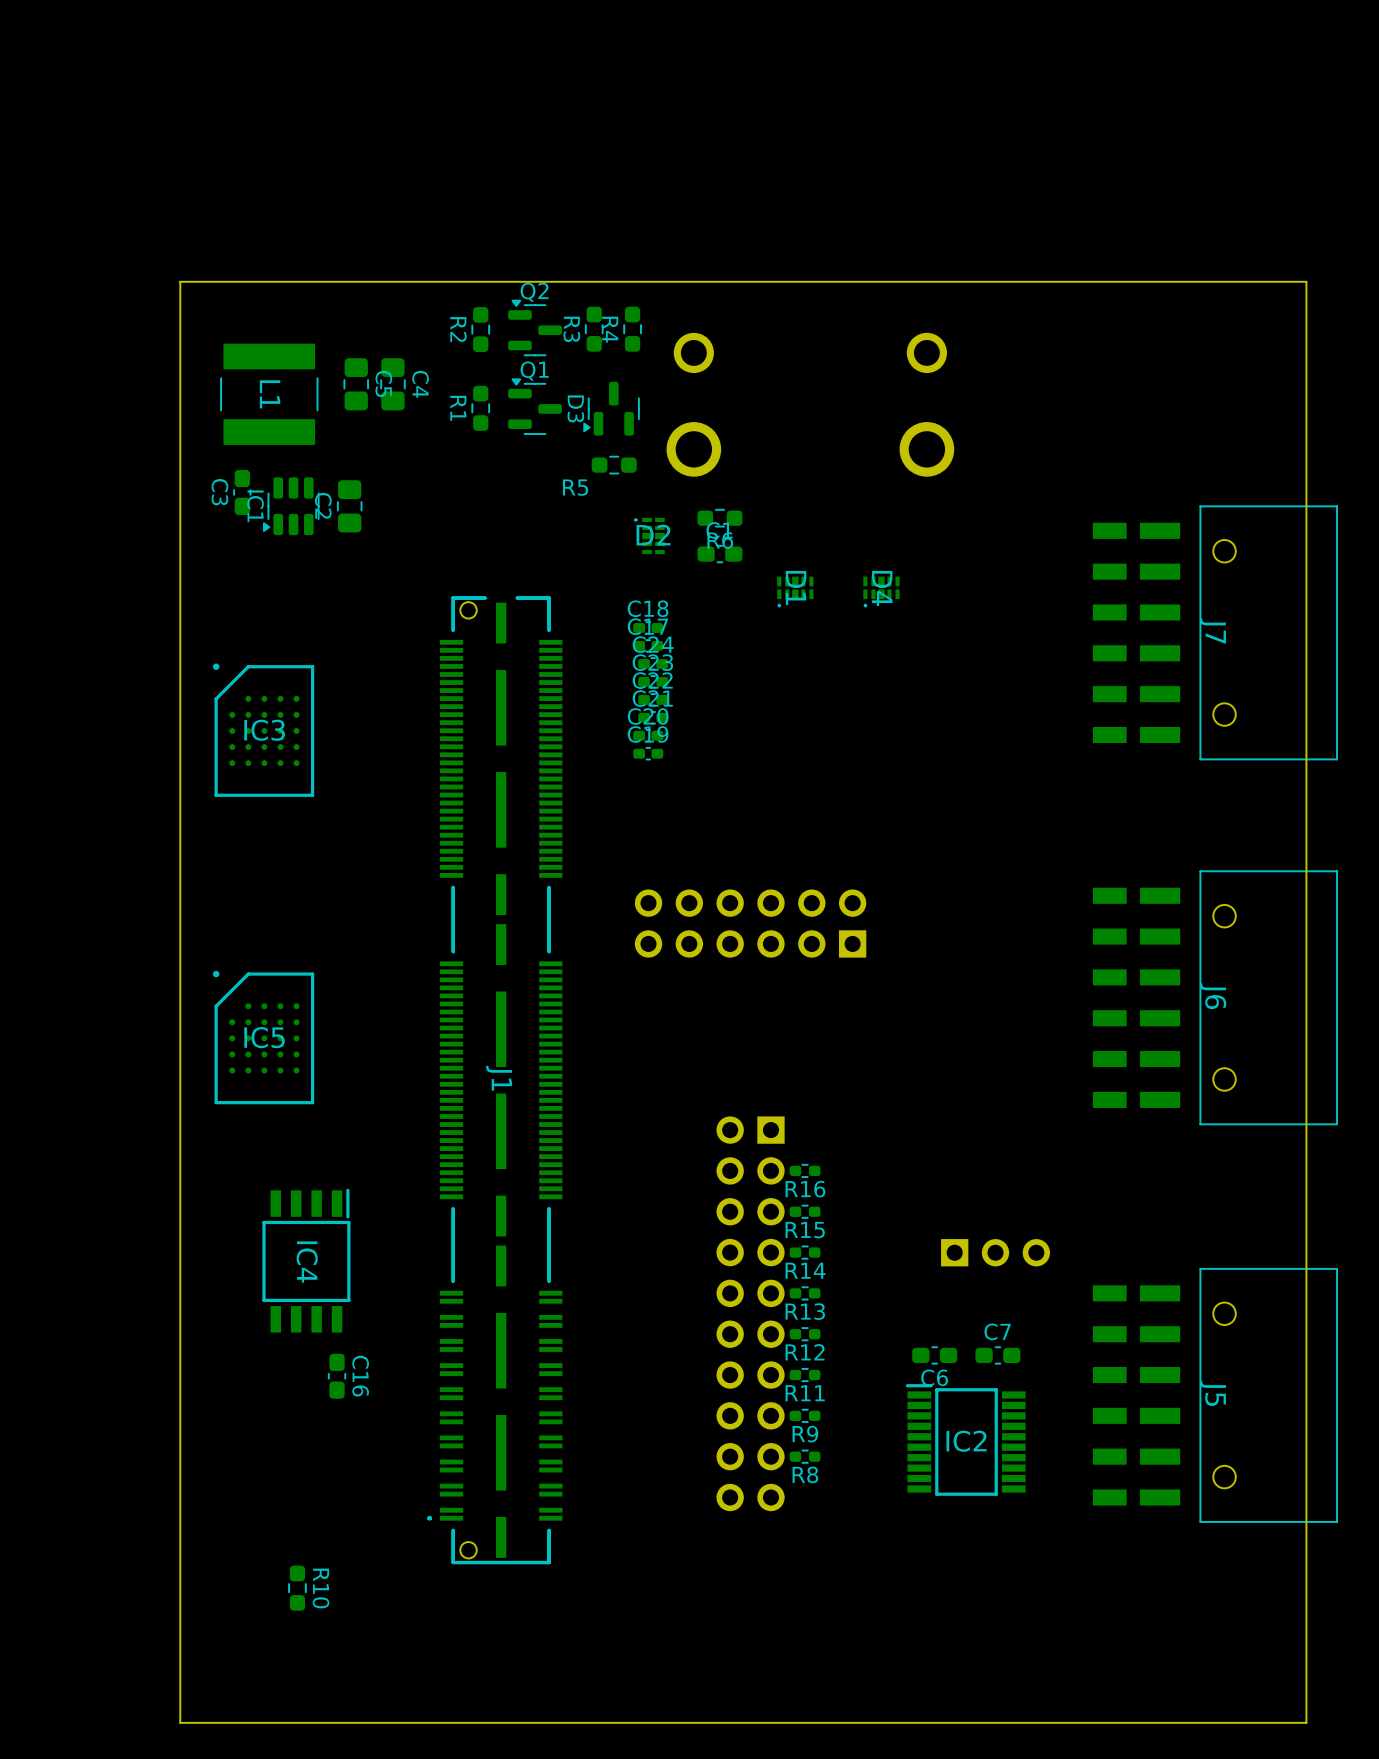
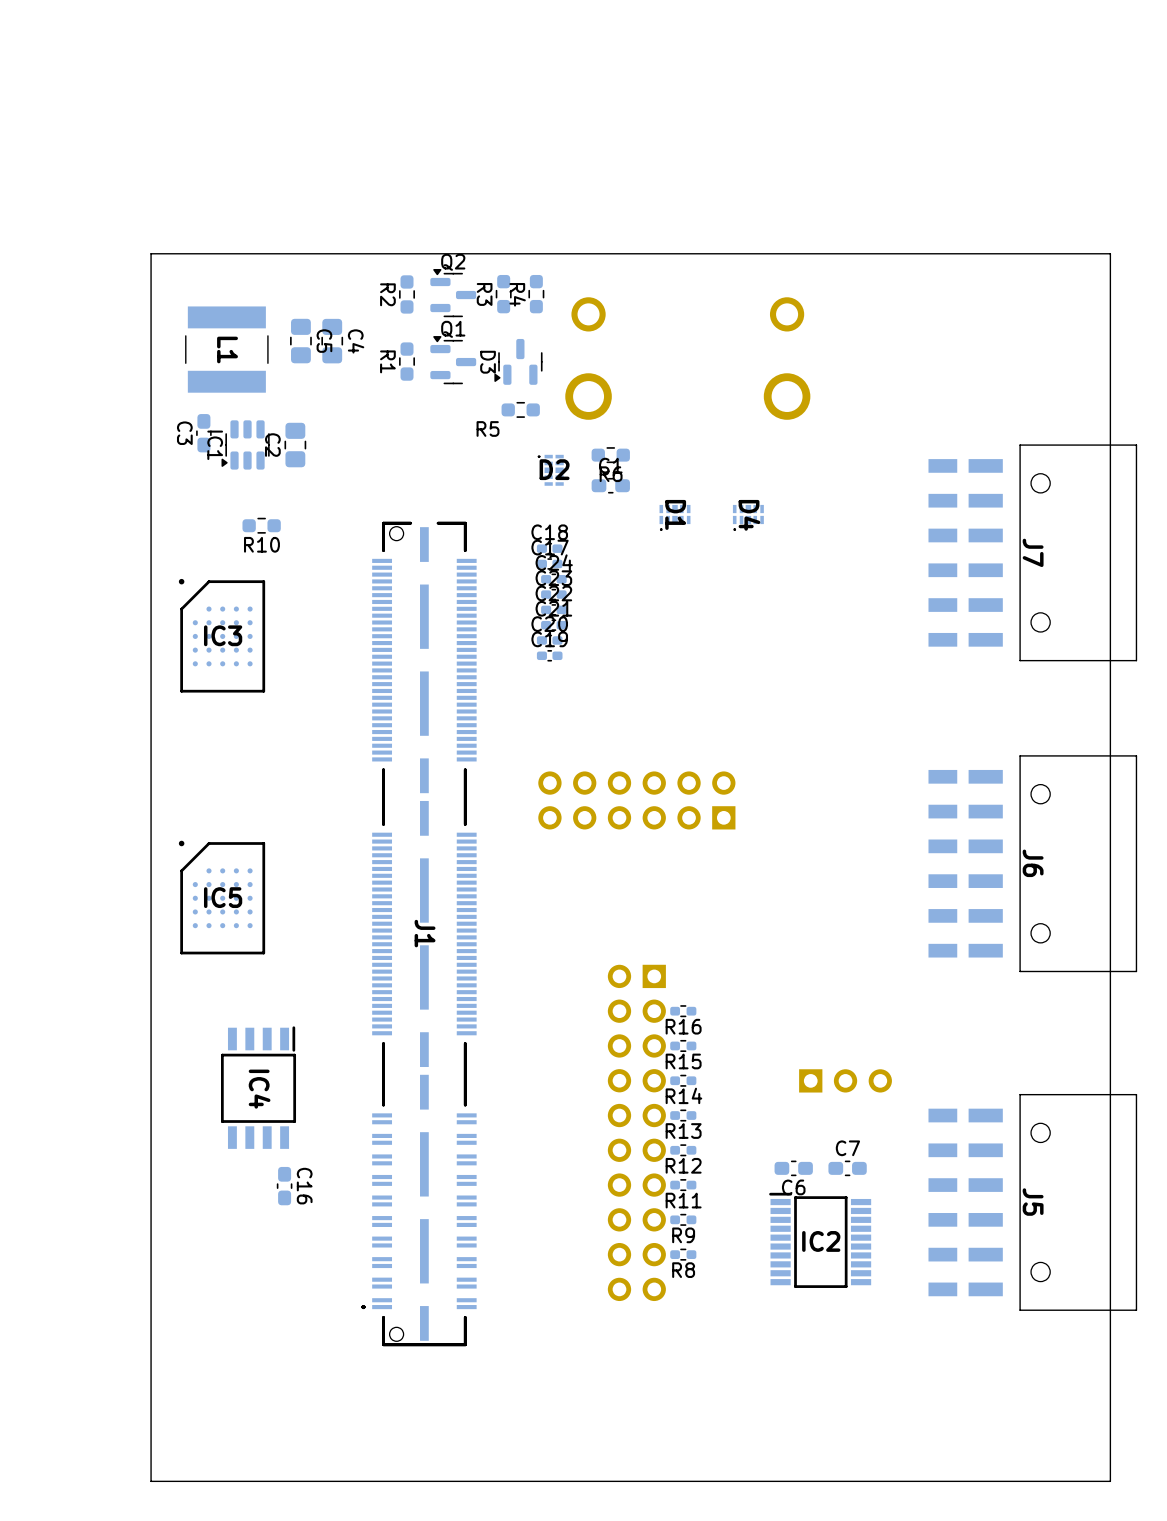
R10 rotation: 0° (297, 1588) -> 90° clockwise (261, 525)
R10 position: (297, 1588) -> (261, 525)

